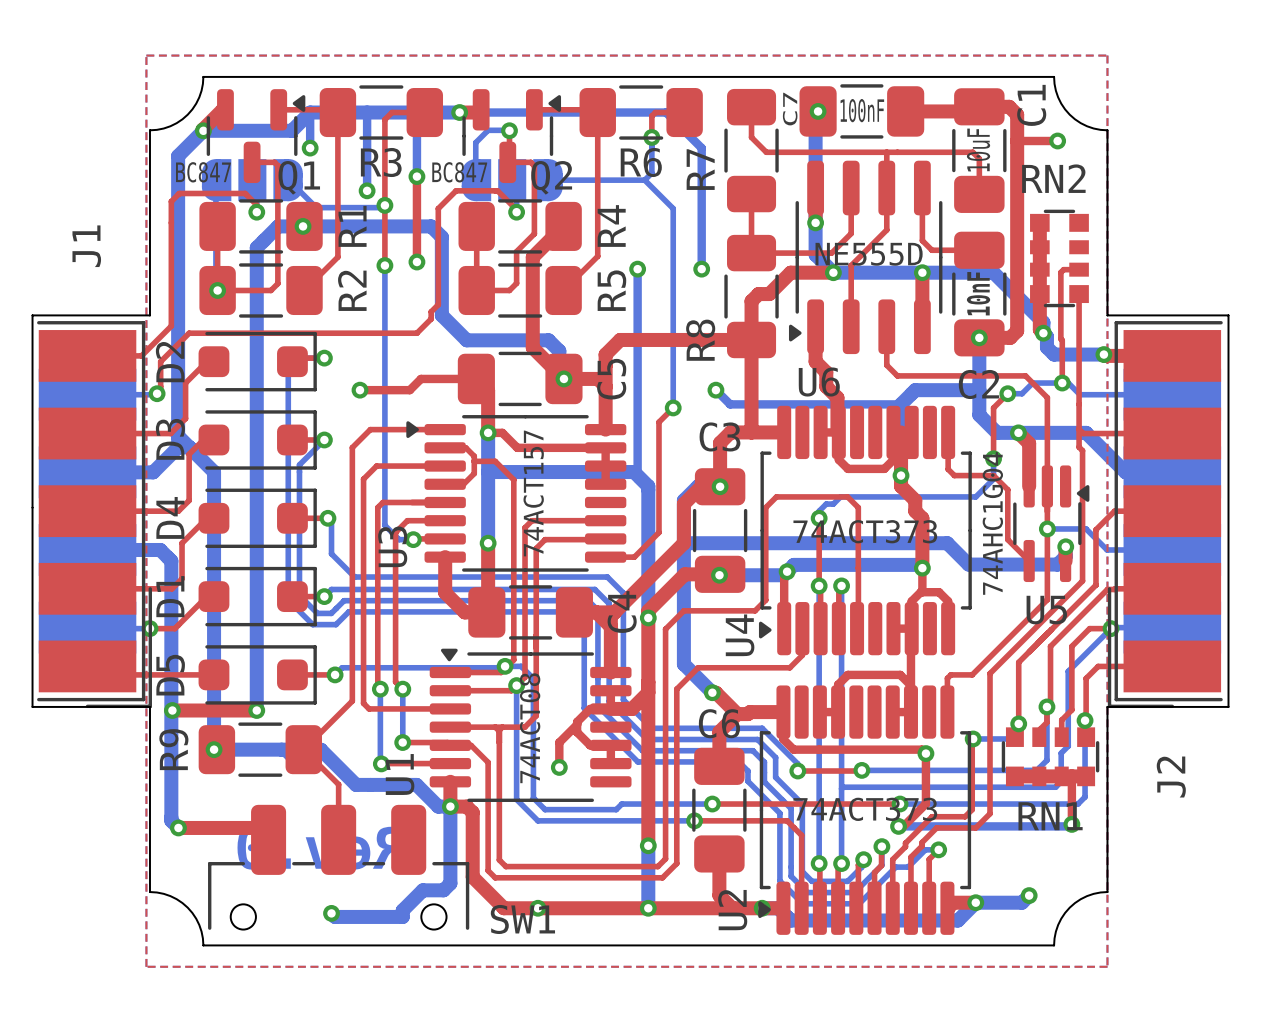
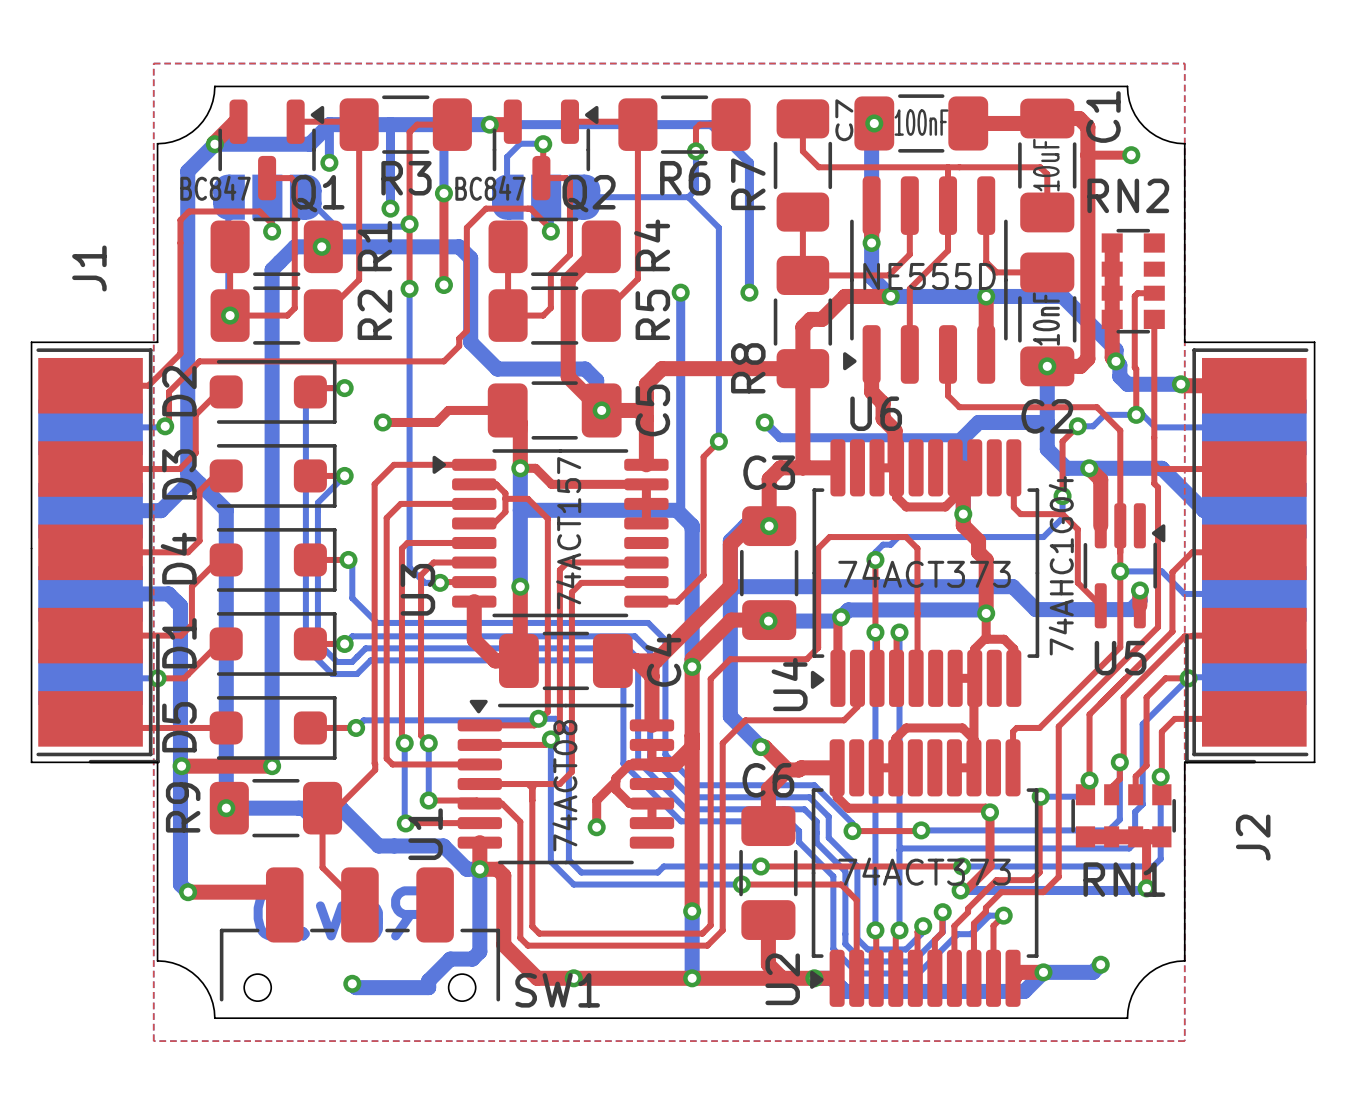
top track: (352, 701) (303, 749) (338, 784) (338, 839) -> (374, 756) (375, 769) (337, 808) (322, 808) (322, 867) (359, 904)

